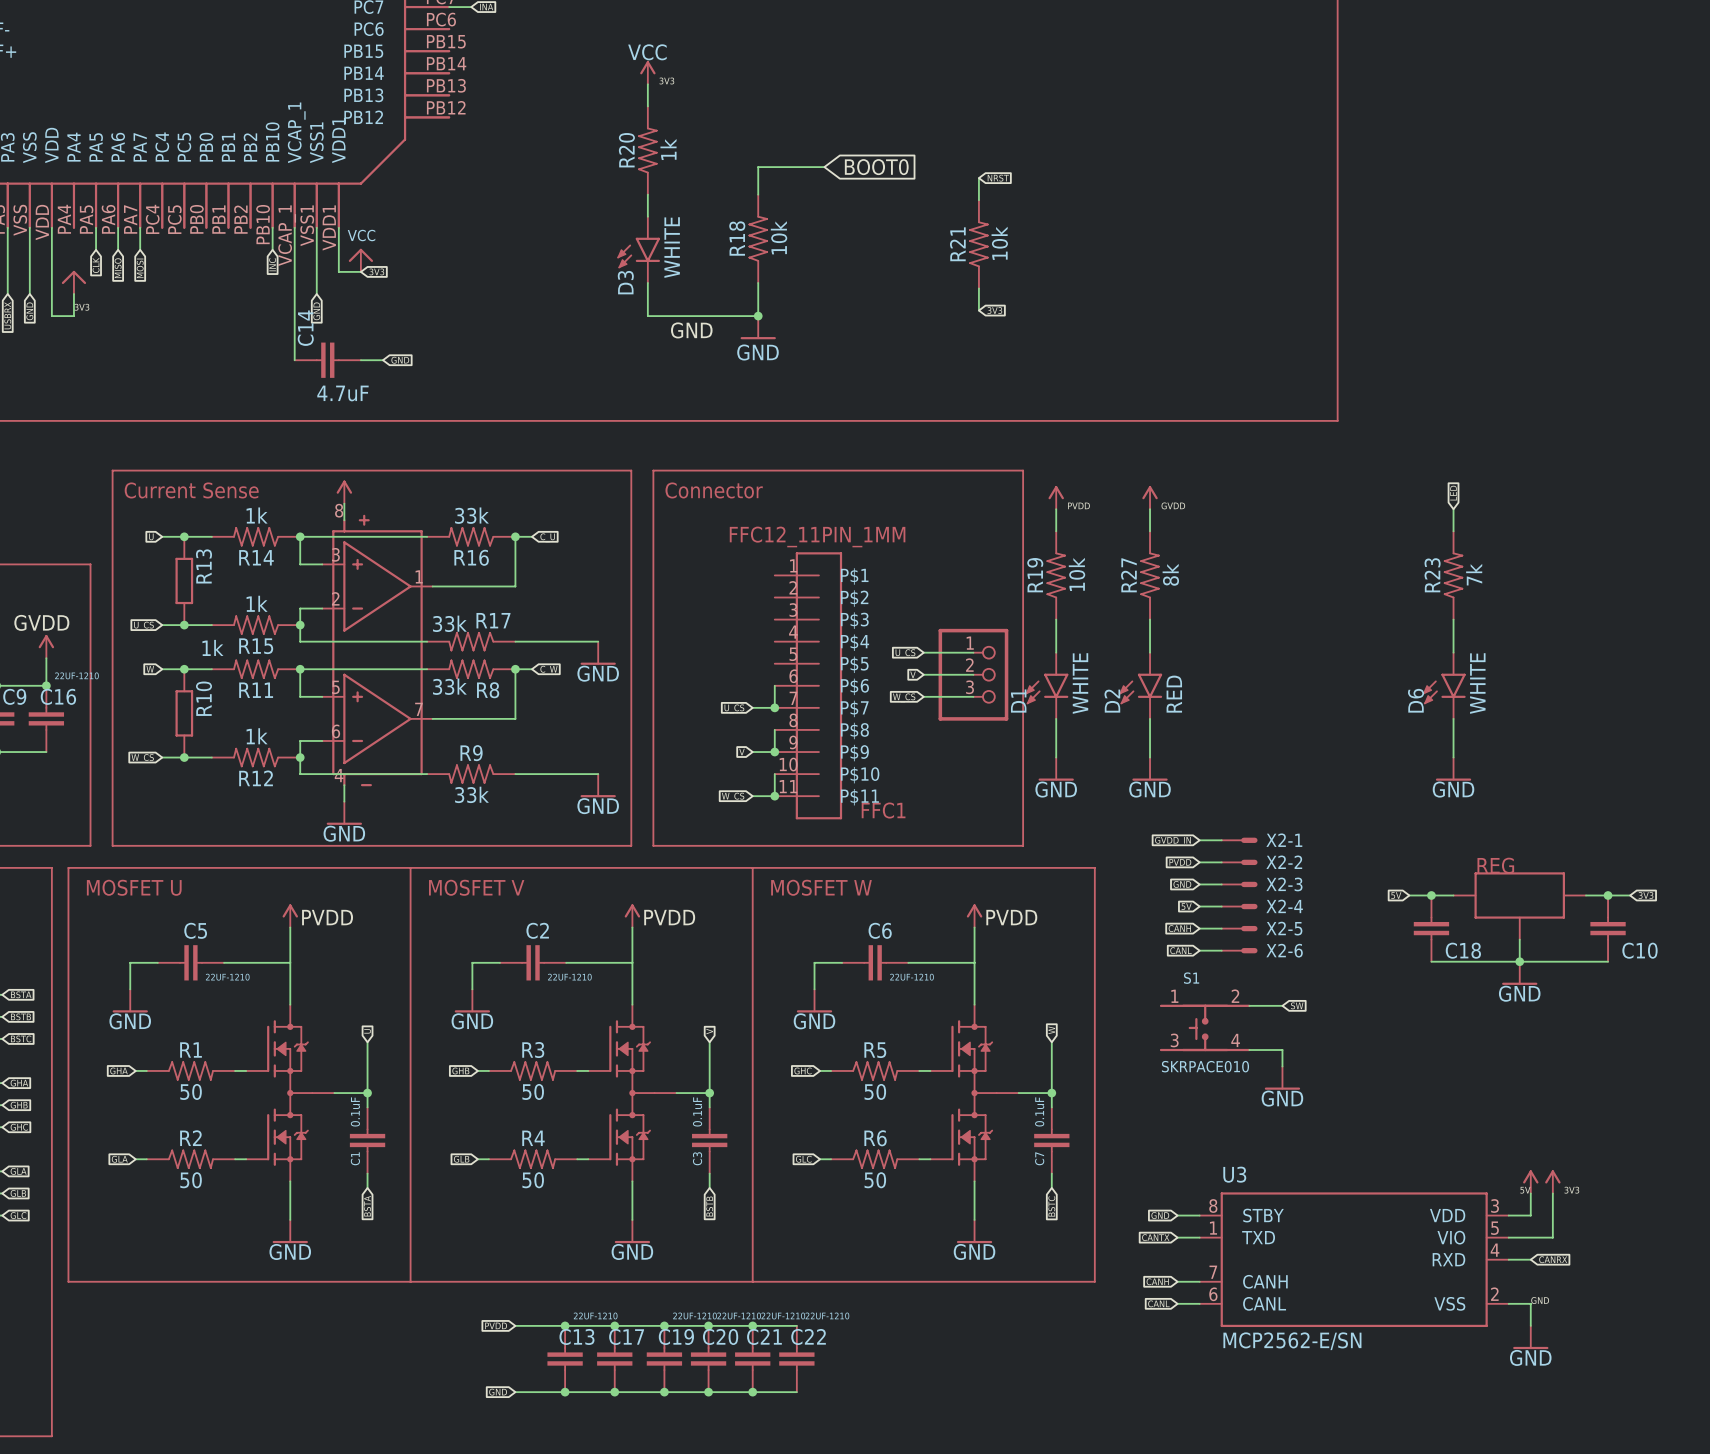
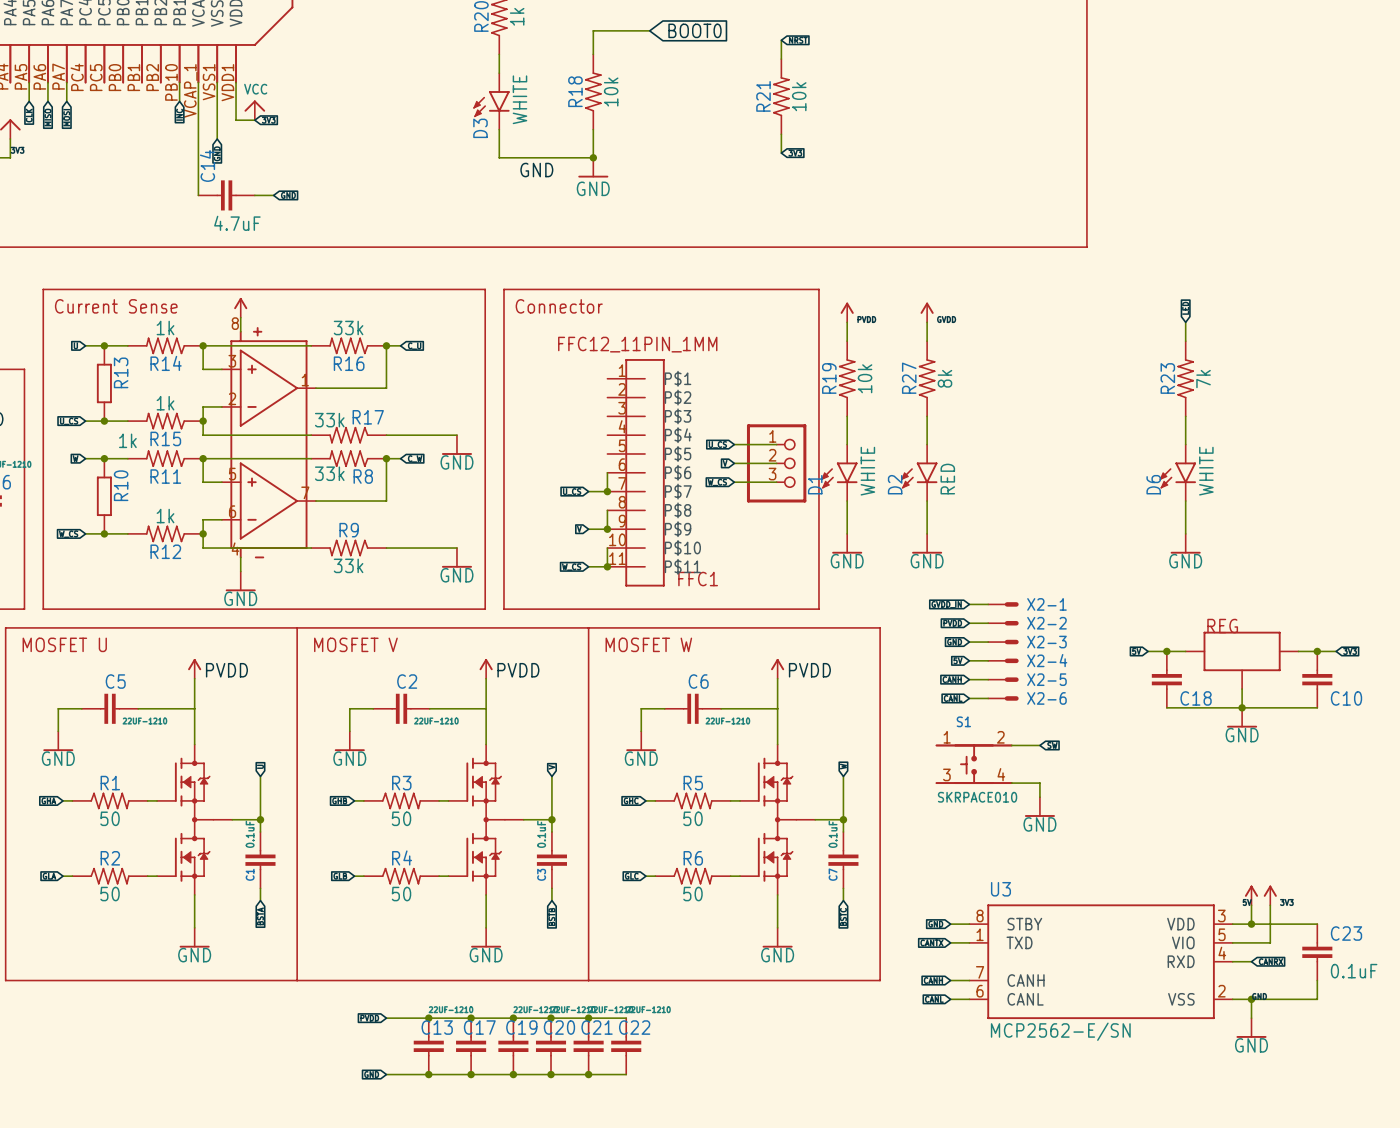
wire: none -> (1251, 924) (1317, 924)
junction: none -> (1251, 924)
C23: none -> 0.1uF (1317, 952)
wire: none -> (1317, 980) (1317, 999) (1251, 999)
junction: none -> (1251, 999)

